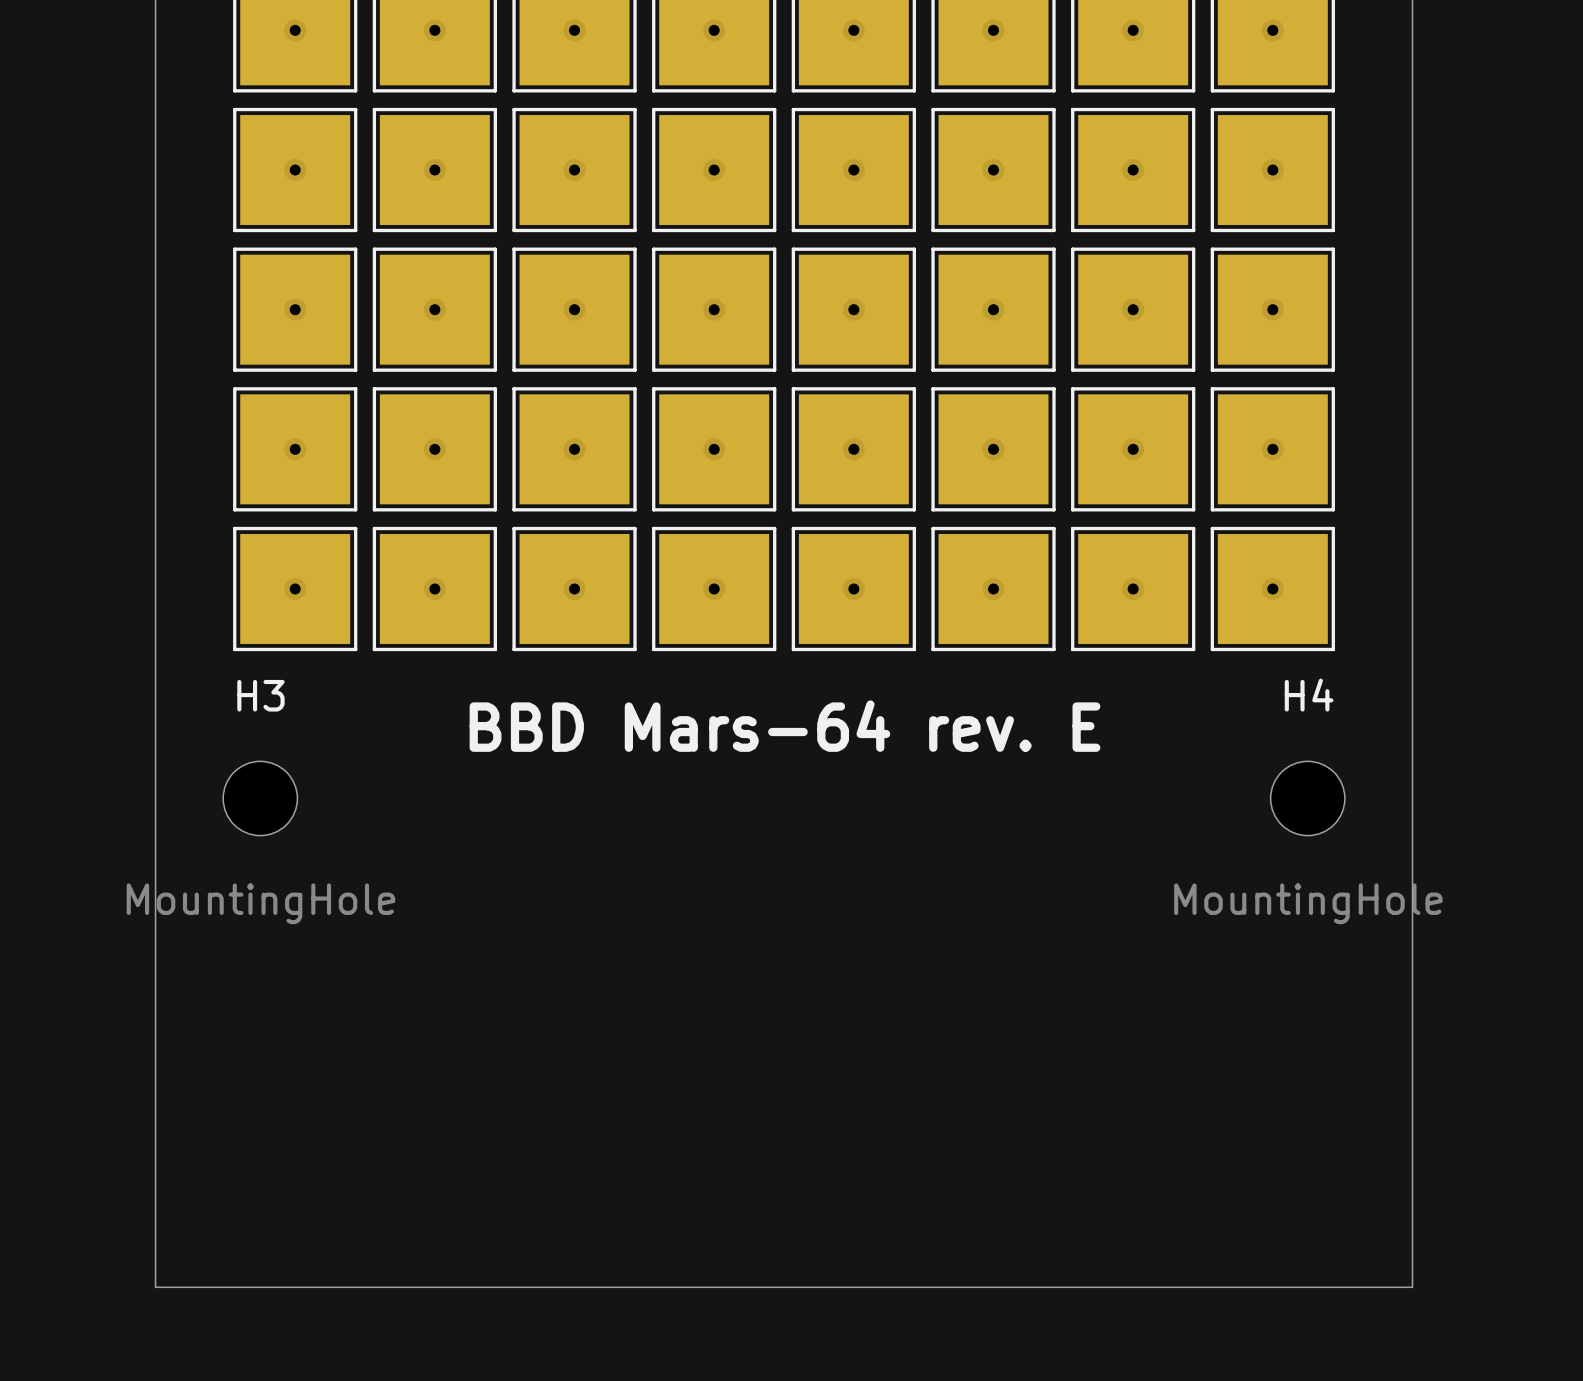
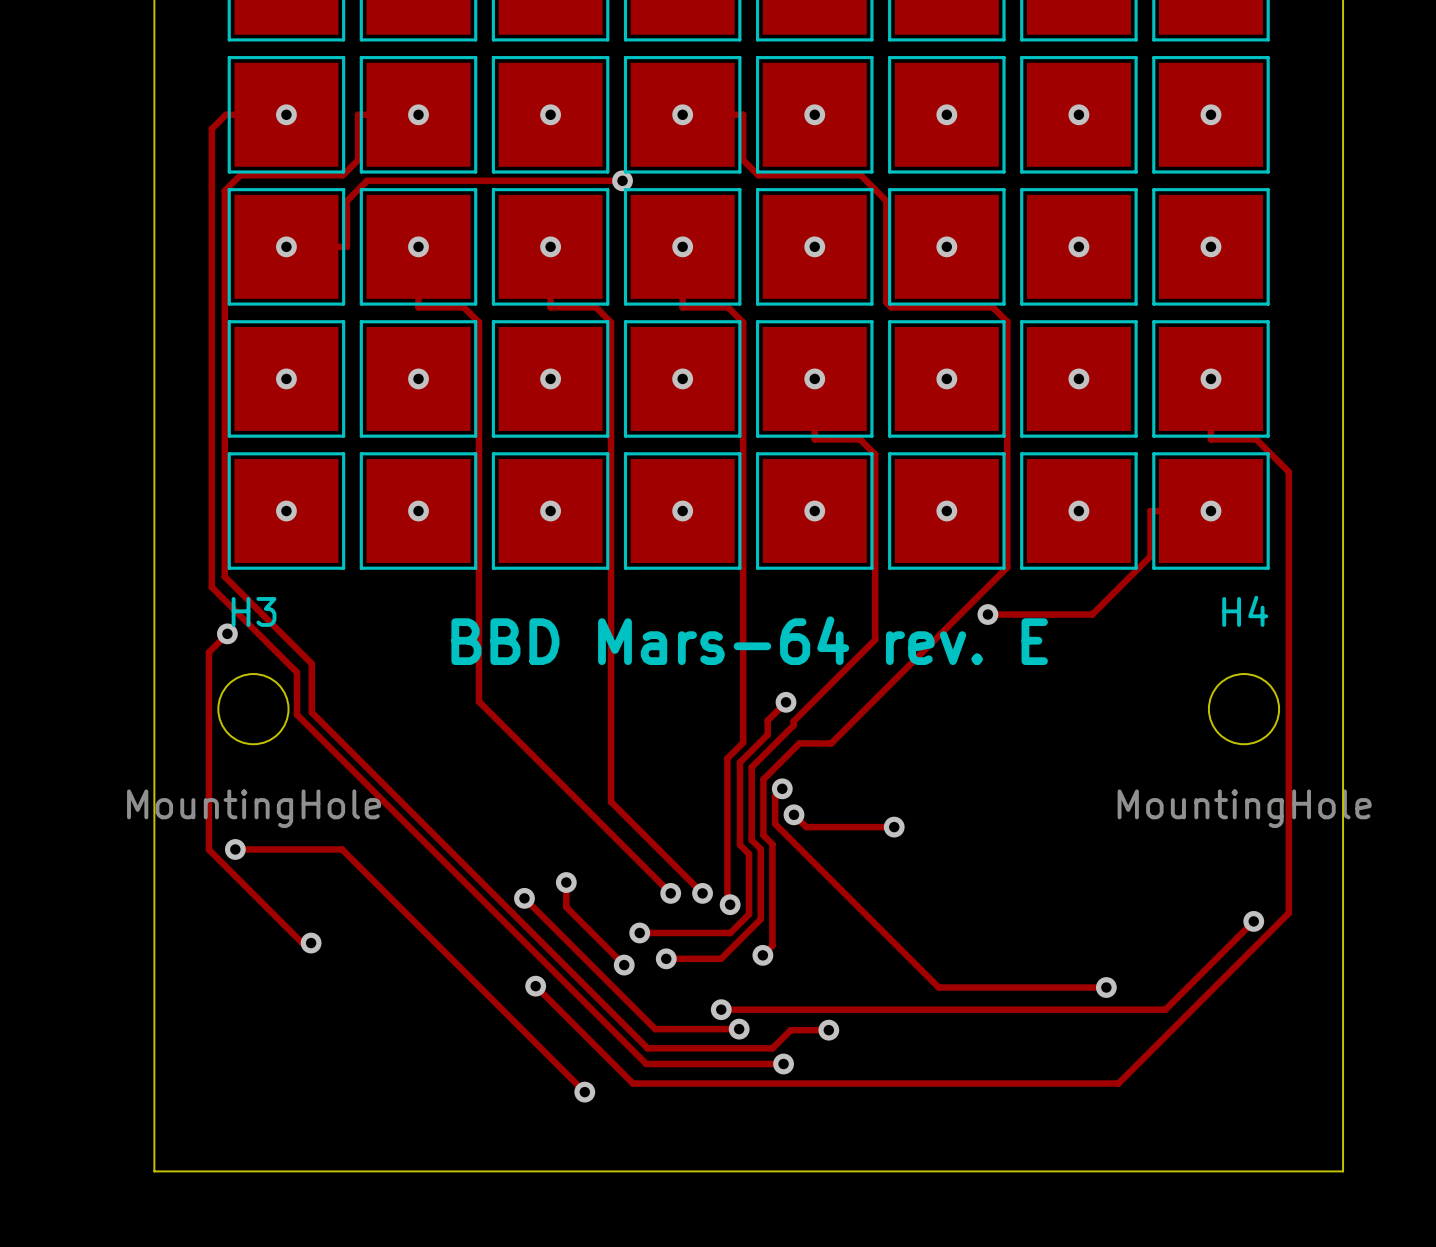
track: none -> (286, 114) (225, 114) (211, 128) (211, 587) (296, 672) (296, 714) (646, 1064) (783, 1064)
track: none -> (418, 114) (358, 114) (358, 160) (342, 175) (240, 175) (224, 190) (224, 576) (311, 663) (311, 712) (647, 1048) (772, 1048) (790, 1030) (828, 1030)
track: none -> (682, 114) (743, 114) (743, 160) (758, 175) (860, 175) (886, 200) (886, 302) (891, 307) (992, 307) (1007, 321) (1007, 567) (831, 743) (799, 743) (763, 779) (763, 835) (772, 844) (772, 945) (762, 955)
track: none -> (622, 180) (367, 180) (346, 200) (346, 246) (286, 246)
via: none -> (622, 180)
track: none -> (418, 246) (418, 307) (463, 307) (478, 322) (478, 701) (670, 893)
track: none -> (550, 246) (550, 307) (595, 307) (611, 322) (611, 801) (702, 893)
track: none -> (682, 246) (682, 307) (728, 307) (743, 322) (743, 742) (727, 758) (727, 901) (730, 904)
track: none -> (814, 378) (814, 439) (860, 439) (875, 454) (875, 639) (793, 721) (793, 725) (751, 767) (751, 840) (760, 849) (760, 919) (721, 958) (666, 958)
track: none -> (1210, 378) (1210, 439) (1256, 439) (1288, 471) (1288, 913) (1118, 1083) (633, 1083) (535, 986)
track: none -> (1210, 511) (1150, 511) (1150, 556) (1092, 614) (987, 614)
via: none -> (987, 614)
track: none -> (227, 633) (208, 652) (208, 849) (302, 943) (311, 943)
via: none -> (227, 633)
track: none -> (786, 702) (767, 720) (767, 734) (740, 762) (740, 844) (749, 853) (749, 914) (730, 932) (639, 932)
via: none -> (786, 702)
track: none -> (782, 788) (775, 795) (775, 823) (938, 987) (1106, 987)
via: none -> (782, 788)
track: none -> (793, 814) (806, 827) (894, 827)
via: none -> (793, 814)
via: none -> (894, 827)
track: none -> (235, 849) (342, 849) (584, 1092)
via: none -> (235, 849)
track: none -> (566, 882) (566, 907) (624, 965)
via: none -> (566, 882)
via: none -> (670, 893)
via: none -> (702, 893)
track: none -> (524, 898) (655, 1029) (739, 1029)
via: none -> (524, 898)
via: none -> (730, 904)
track: none -> (1253, 921) (1165, 1009) (721, 1009)
via: none -> (1253, 921)
via: none -> (639, 932)
via: none -> (311, 943)
via: none -> (762, 955)
via: none -> (666, 958)
via: none -> (624, 965)
via: none -> (535, 986)
via: none -> (1106, 987)
via: none -> (721, 1009)
via: none -> (739, 1029)
via: none -> (828, 1030)
via: none -> (783, 1064)
via: none -> (584, 1092)

